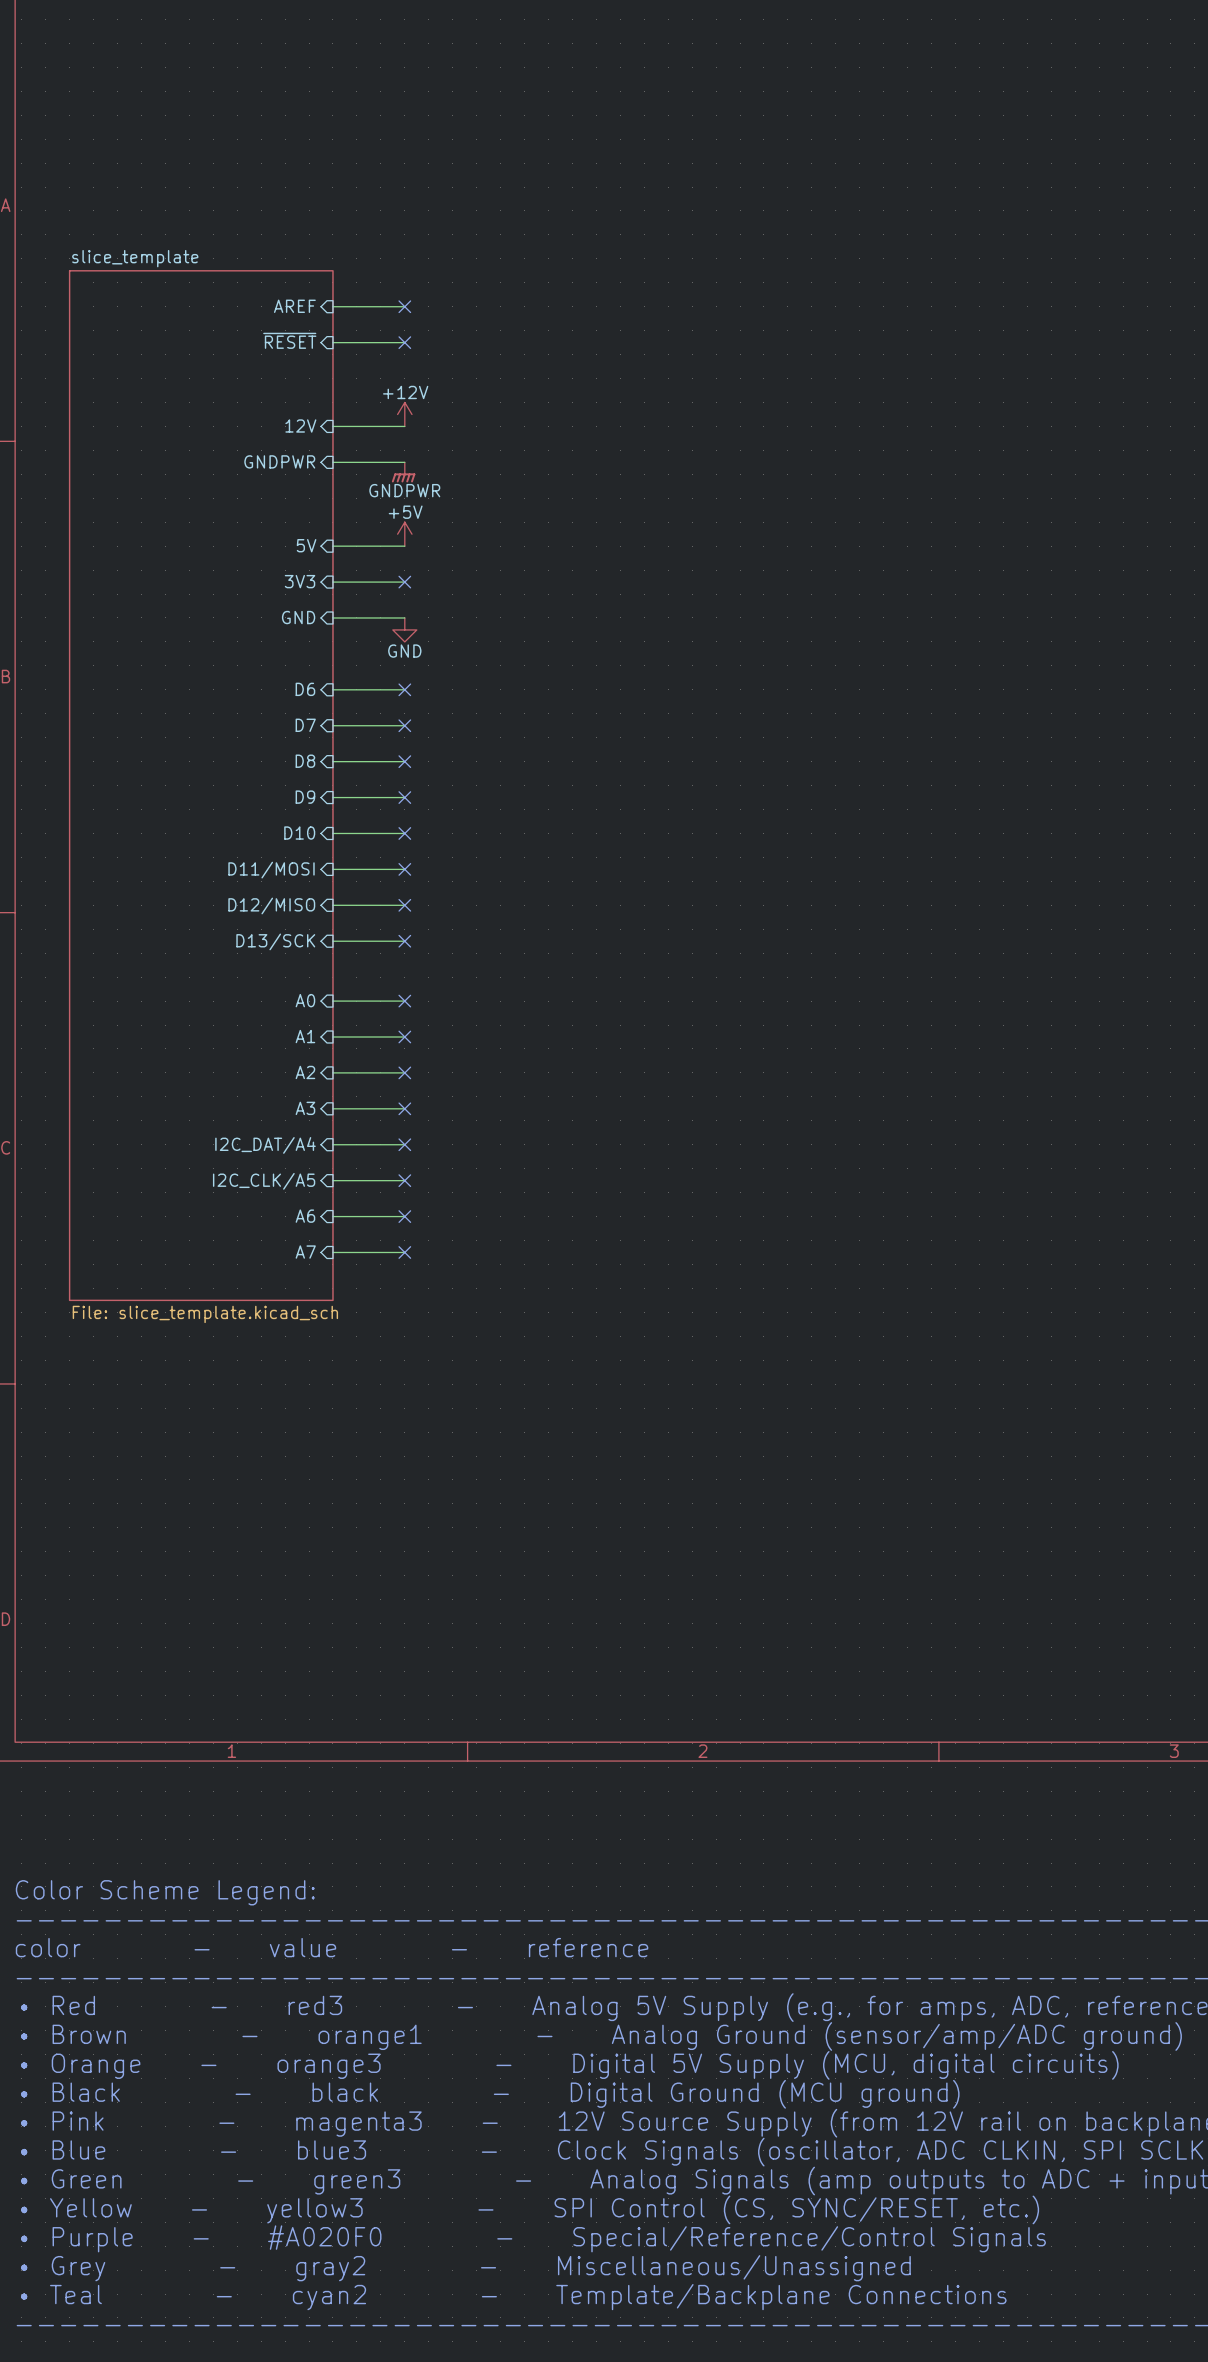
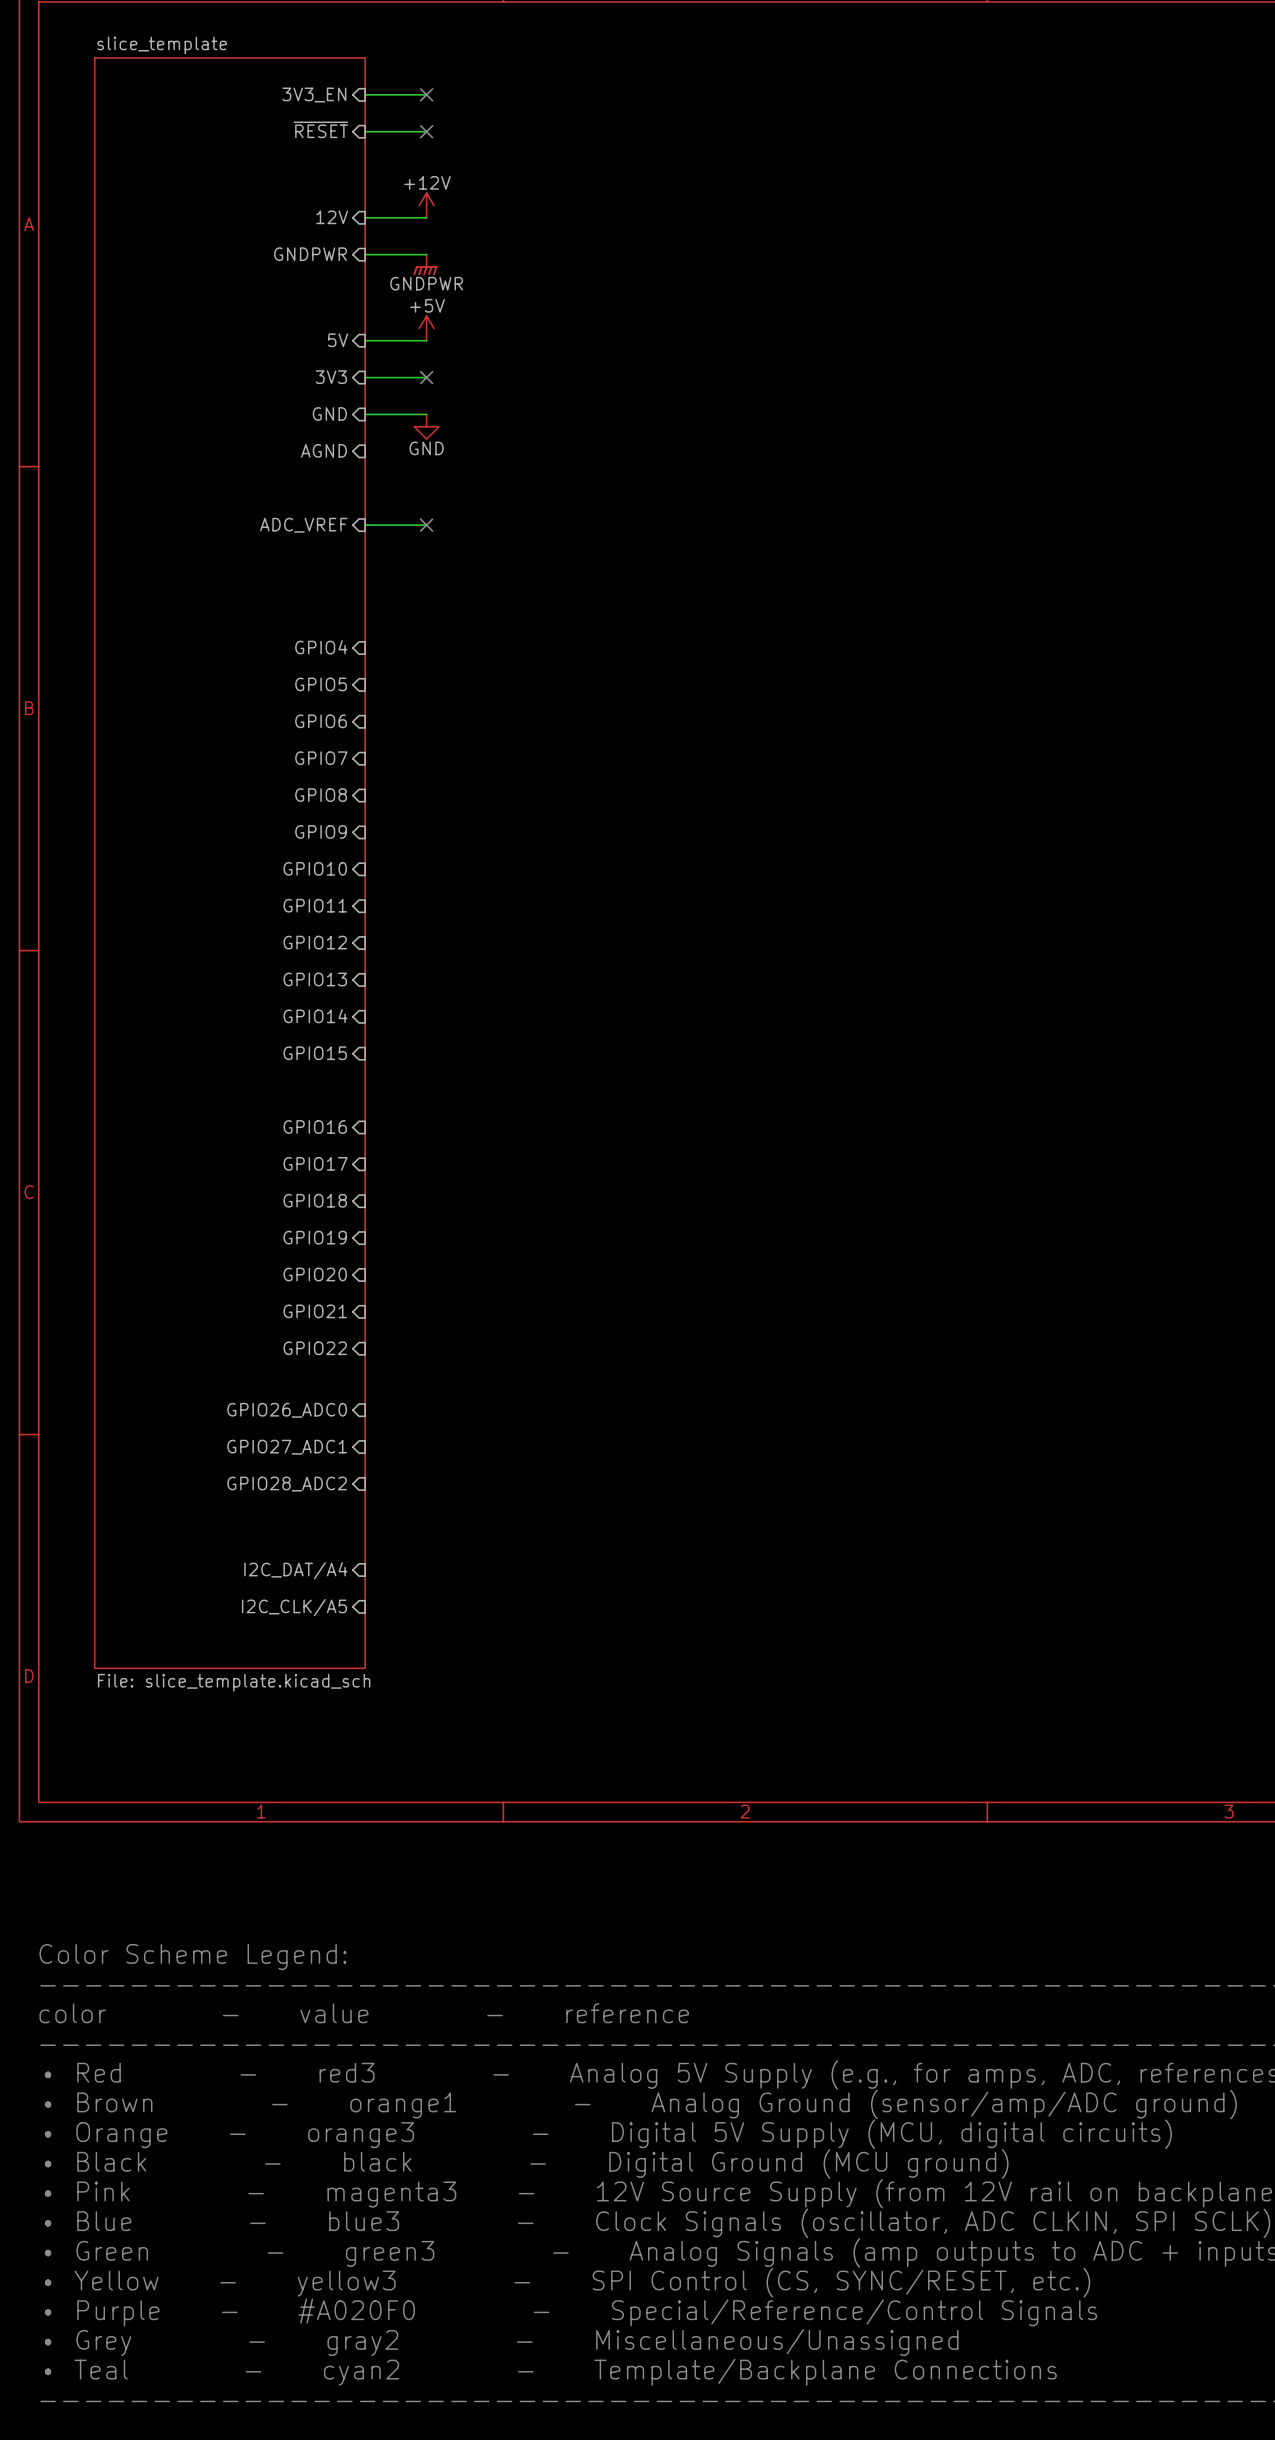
sheet pin: none -> 3V3_EN (314, 94)
wire: none -> (365, 94) (426, 94)
no-connect mark: none -> (426, 94)
wire: none -> (365, 131) (426, 131)
no-connect mark: none -> (426, 131)
sheet pin: none -> 12V (332, 217)
wire: none -> (365, 217) (426, 217)
wire: none -> (365, 254) (426, 254)
sheet pin: AREF (294, 306) -> none
wire: (332, 306) (404, 306) -> none
no-connect mark: (404, 306) -> none
wire: none -> (365, 340) (426, 340)
sheet pin position: ~{RESET} (289, 340) -> ~{RESET} (320, 129)
wire: (332, 342) (404, 342) -> none
no-connect mark position: (404, 342) -> (426, 377)
wire: none -> (365, 377) (426, 377)
sheet pin: none -> GND (329, 414)
wire: none -> (365, 414) (426, 414)
power symbol position: +12V (404, 414) -> +12V (426, 205)
sheet pin: 12V (300, 425) -> AGND (323, 450)
wire: (332, 426) (404, 426) -> none
sheet pin position: GNDPWR (279, 461) -> GNDPWR (310, 254)
wire: (332, 462) (404, 462) -> none
power symbol position: GNDPWR (403, 472) -> GNDPWR (425, 264)
sheet pin: none -> ADC_VREF (303, 525)
wire: none -> (365, 525) (426, 525)
no-connect mark: none -> (426, 525)
power symbol position: +5V (404, 534) -> +5V (426, 328)
sheet pin position: 5V (306, 545) -> 5V (338, 340)
wire: (332, 546) (404, 546) -> none
sheet pin position: 3V3 (300, 581) -> 3V3 (331, 377)
wire: (332, 582) (404, 582) -> none
no-connect mark: (404, 582) -> none
sheet pin: GND (298, 617) -> GPIO4 (321, 647)
wire: (332, 617) (404, 617) -> none
power symbol position: GND (404, 629) -> GND (426, 426)
sheet pin: none -> GPIO5 (321, 684)
sheet pin: D6 (305, 689) -> GPIO6 (321, 721)
wire: (332, 689) (404, 689) -> none
no-connect mark: (404, 689) -> none
sheet pin: D7 (305, 725) -> GPIO7 (321, 758)
wire: (332, 725) (404, 725) -> none
no-connect mark: (404, 725) -> none
sheet pin: D8 (305, 761) -> GPIO8 (321, 795)
wire: (332, 761) (404, 761) -> none
no-connect mark: (404, 761) -> none
sheet slice_template: File: slice_template.kicad_sch (201, 785) -> none
sheet pin: D9 (305, 797) -> GPIO9 (321, 831)
wire: (332, 797) (404, 797) -> none
no-connect mark: (404, 797) -> none
sheet slice_template: none -> File: slice_template.kicad_sch (229, 863)
sheet pin: D10 (299, 833) -> GPIO10 (315, 868)
wire: (332, 833) (404, 833) -> none
no-connect mark: (404, 833) -> none
wire: (332, 869) (404, 869) -> none
no-connect mark: (404, 869) -> none
sheet pin: D11/MOSI (271, 870) -> GPIO11 (315, 905)
wire: (332, 905) (404, 905) -> none
no-connect mark: (404, 905) -> none
sheet pin: D12/MISO (271, 906) -> GPIO12 (315, 942)
sheet pin: D13/SCK (275, 941) -> GPIO13 (315, 979)
wire: (332, 941) (404, 941) -> none
no-connect mark: (404, 941) -> none
sheet pin: none -> GPIO14 (315, 1016)
sheet pin: A0 (305, 1000) -> none
wire: (332, 1001) (404, 1001) -> none
no-connect mark: (404, 1001) -> none
sheet pin: none -> GPIO15 (315, 1053)
sheet pin: A1 (305, 1036) -> none
wire: (332, 1036) (404, 1036) -> none
no-connect mark: (404, 1036) -> none
sheet pin: A2 (305, 1072) -> none
wire: (332, 1072) (404, 1072) -> none
no-connect mark: (404, 1072) -> none
sheet pin: none -> GPIO16 (315, 1126)
sheet pin: A3 (305, 1108) -> none
wire: (332, 1108) (404, 1108) -> none
no-connect mark: (404, 1108) -> none
sheet pin: none -> GPIO17 (315, 1163)
wire: (332, 1144) (404, 1144) -> none
no-connect mark: (404, 1144) -> none
sheet pin: I2C_DAT/A4 (265, 1145) -> none
sheet pin: none -> GPIO18 (315, 1200)
wire: (332, 1180) (404, 1180) -> none
no-connect mark: (404, 1180) -> none
sheet pin: I2C_CLK/A5 (264, 1181) -> none
sheet pin: none -> GPIO19 (315, 1237)
sheet pin: A6 (305, 1216) -> none
wire: (332, 1216) (404, 1216) -> none
no-connect mark: (404, 1216) -> none
sheet pin: none -> GPIO20 (315, 1274)
sheet pin: A7 (305, 1252) -> none
wire: (332, 1252) (404, 1252) -> none
no-connect mark: (404, 1252) -> none
sheet pin: none -> GPIO21 (315, 1311)
sheet pin: none -> GPIO22 (315, 1348)
sheet pin: none -> GPIO26_ADC0 (287, 1410)
sheet pin: none -> GPIO27_ADC1 (287, 1447)
sheet pin: none -> GPIO28_ADC2 (287, 1484)
sheet pin: none -> I2C_DAT/A4 (295, 1570)
sheet pin: none -> I2C_CLK/A5 (294, 1607)

